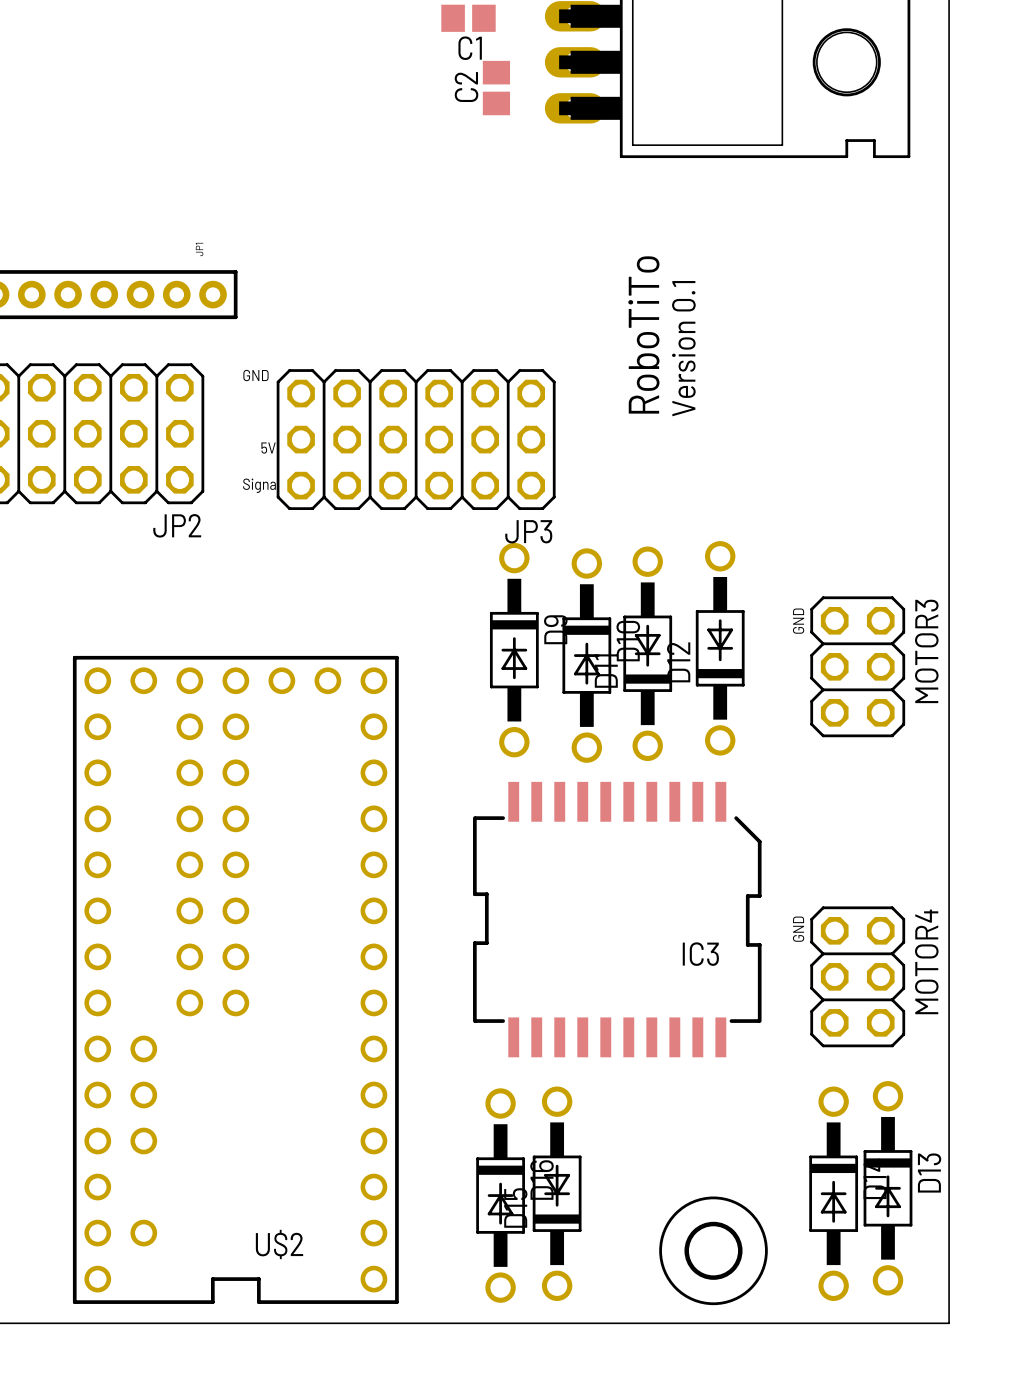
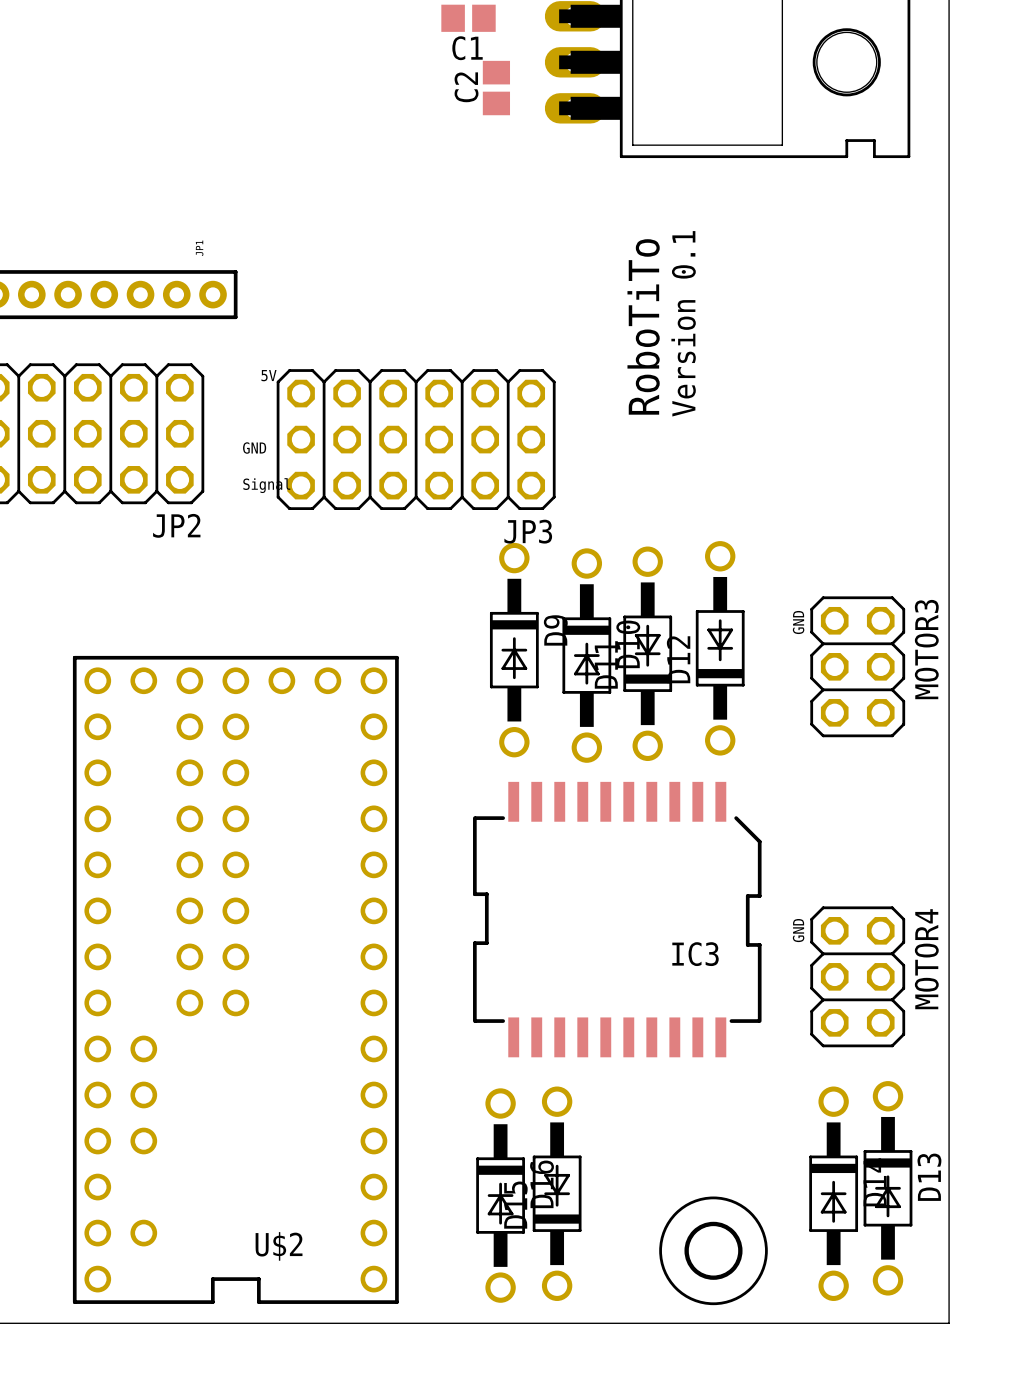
text: GND (255, 375) -> 5V (268, 375)
text: 5V (268, 448) -> GND (254, 448)

